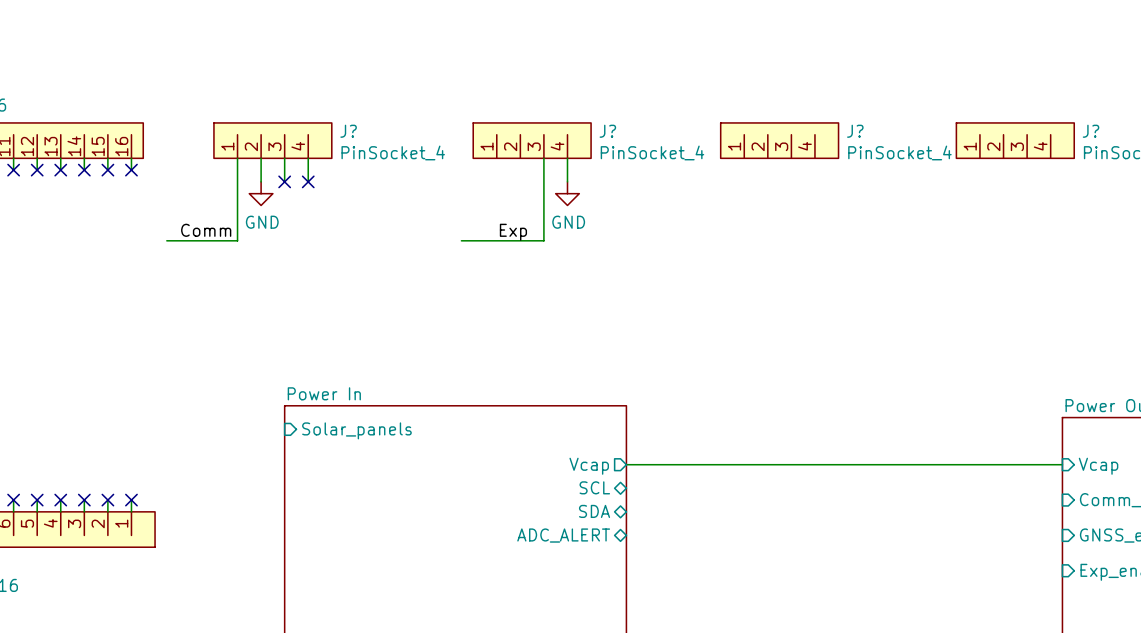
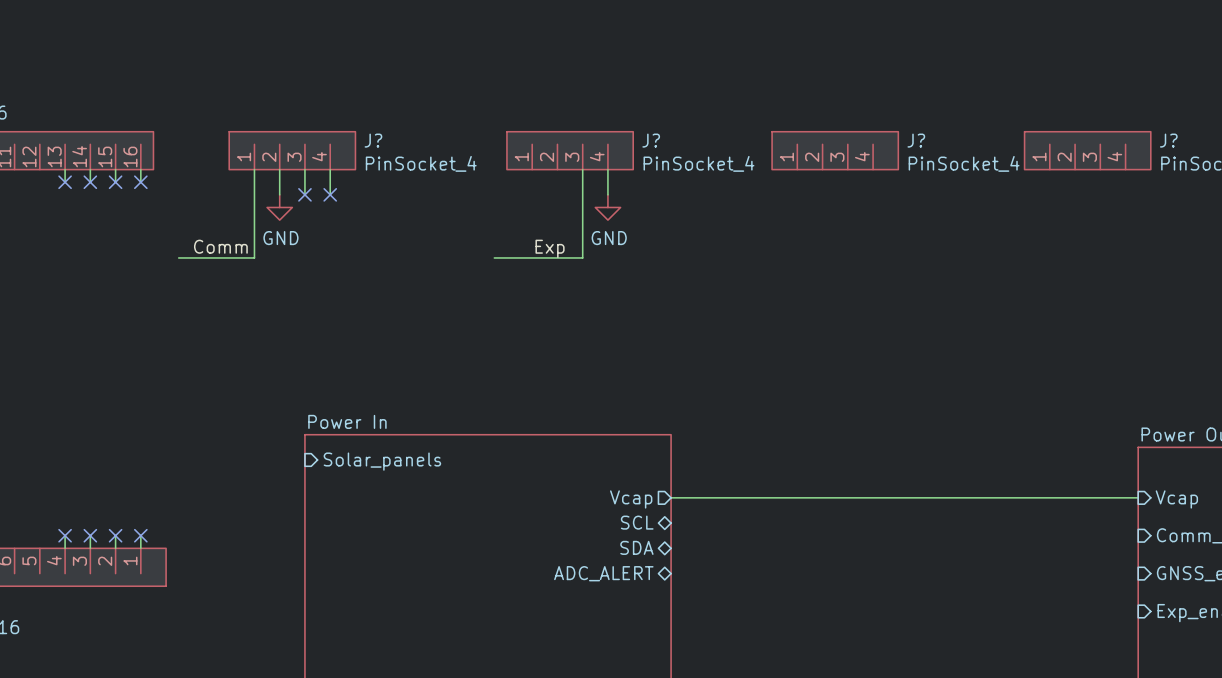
wire: (13, 158) (13, 170) -> none
wire: (37, 158) (37, 170) -> none
no-connect mark: (13, 170) -> none
no-connect mark: (37, 170) -> none
wire: (13, 500) (13, 511) -> none
no-connect mark: (13, 500) -> none
wire: (37, 500) (37, 511) -> none
no-connect mark: (37, 500) -> none

